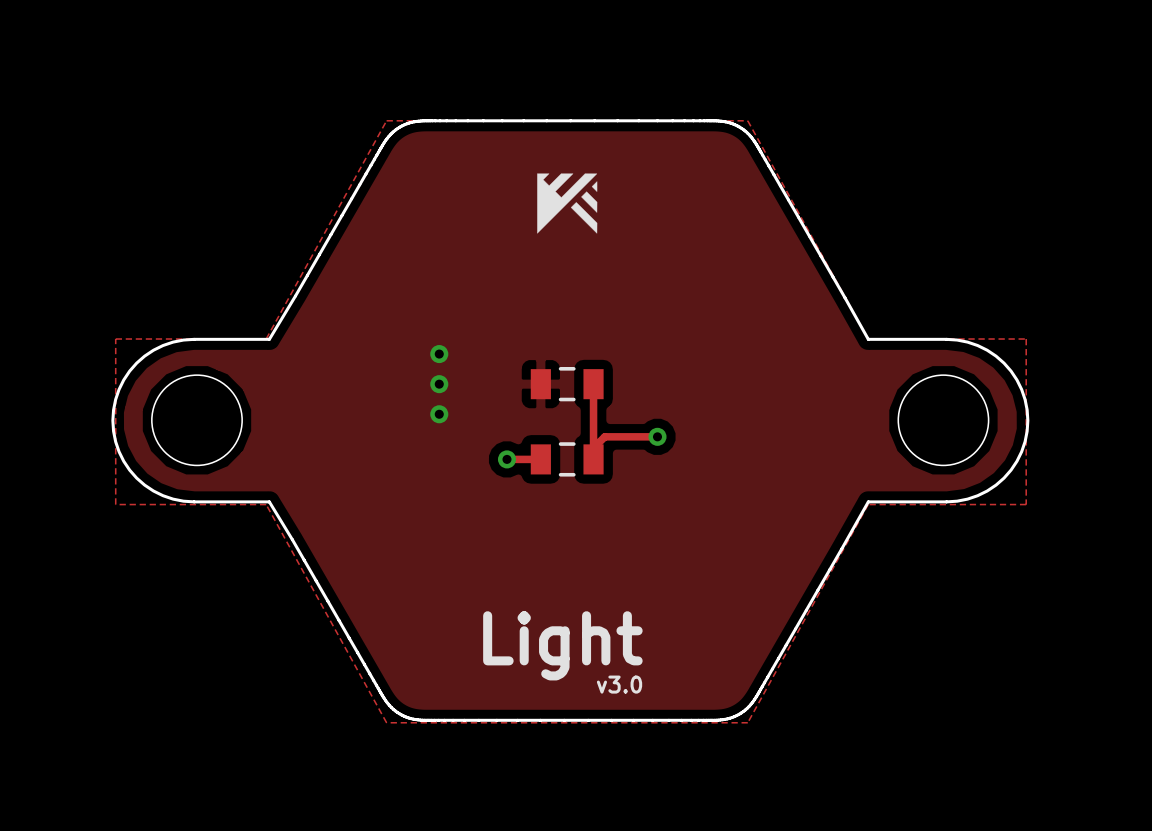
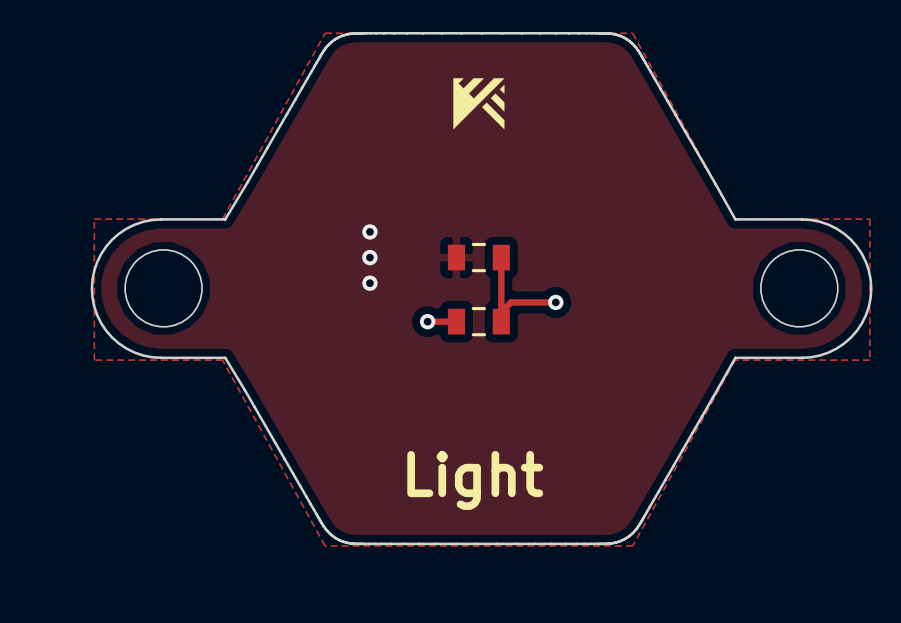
text: v3.0 (619, 684) -> none

